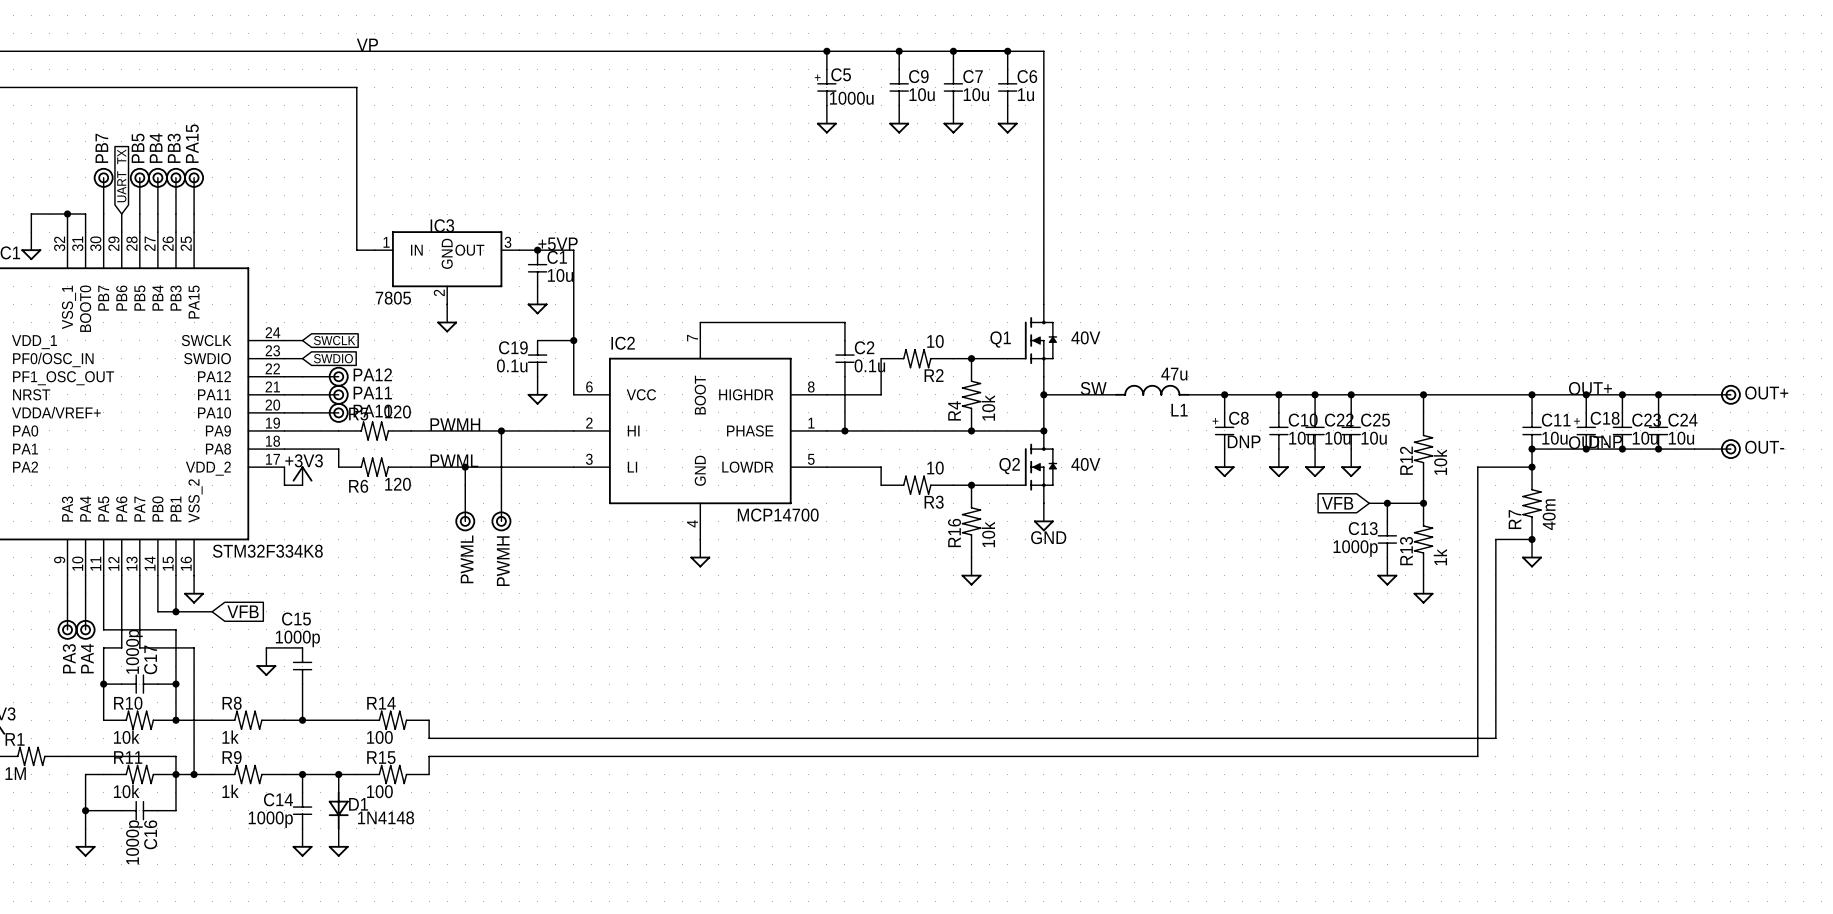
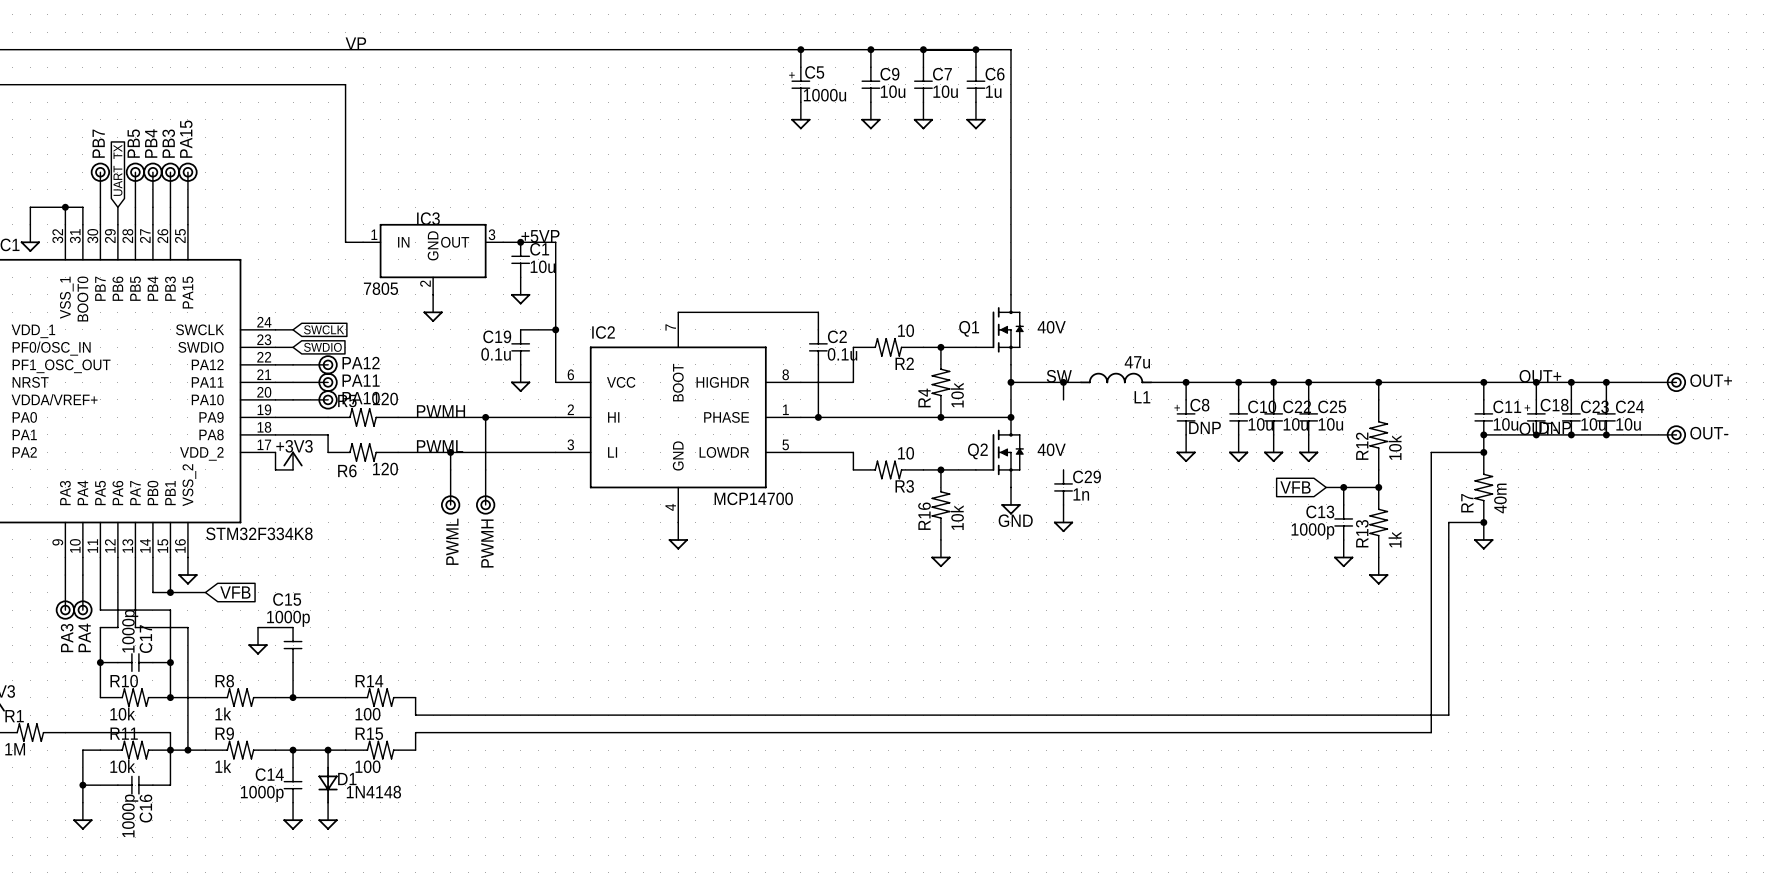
wire: none -> (1063, 382) (1063, 399)
junction: none -> (1063, 382)
C29: none -> 1n (1063, 487)
power symbol: none -> (1063, 518)

